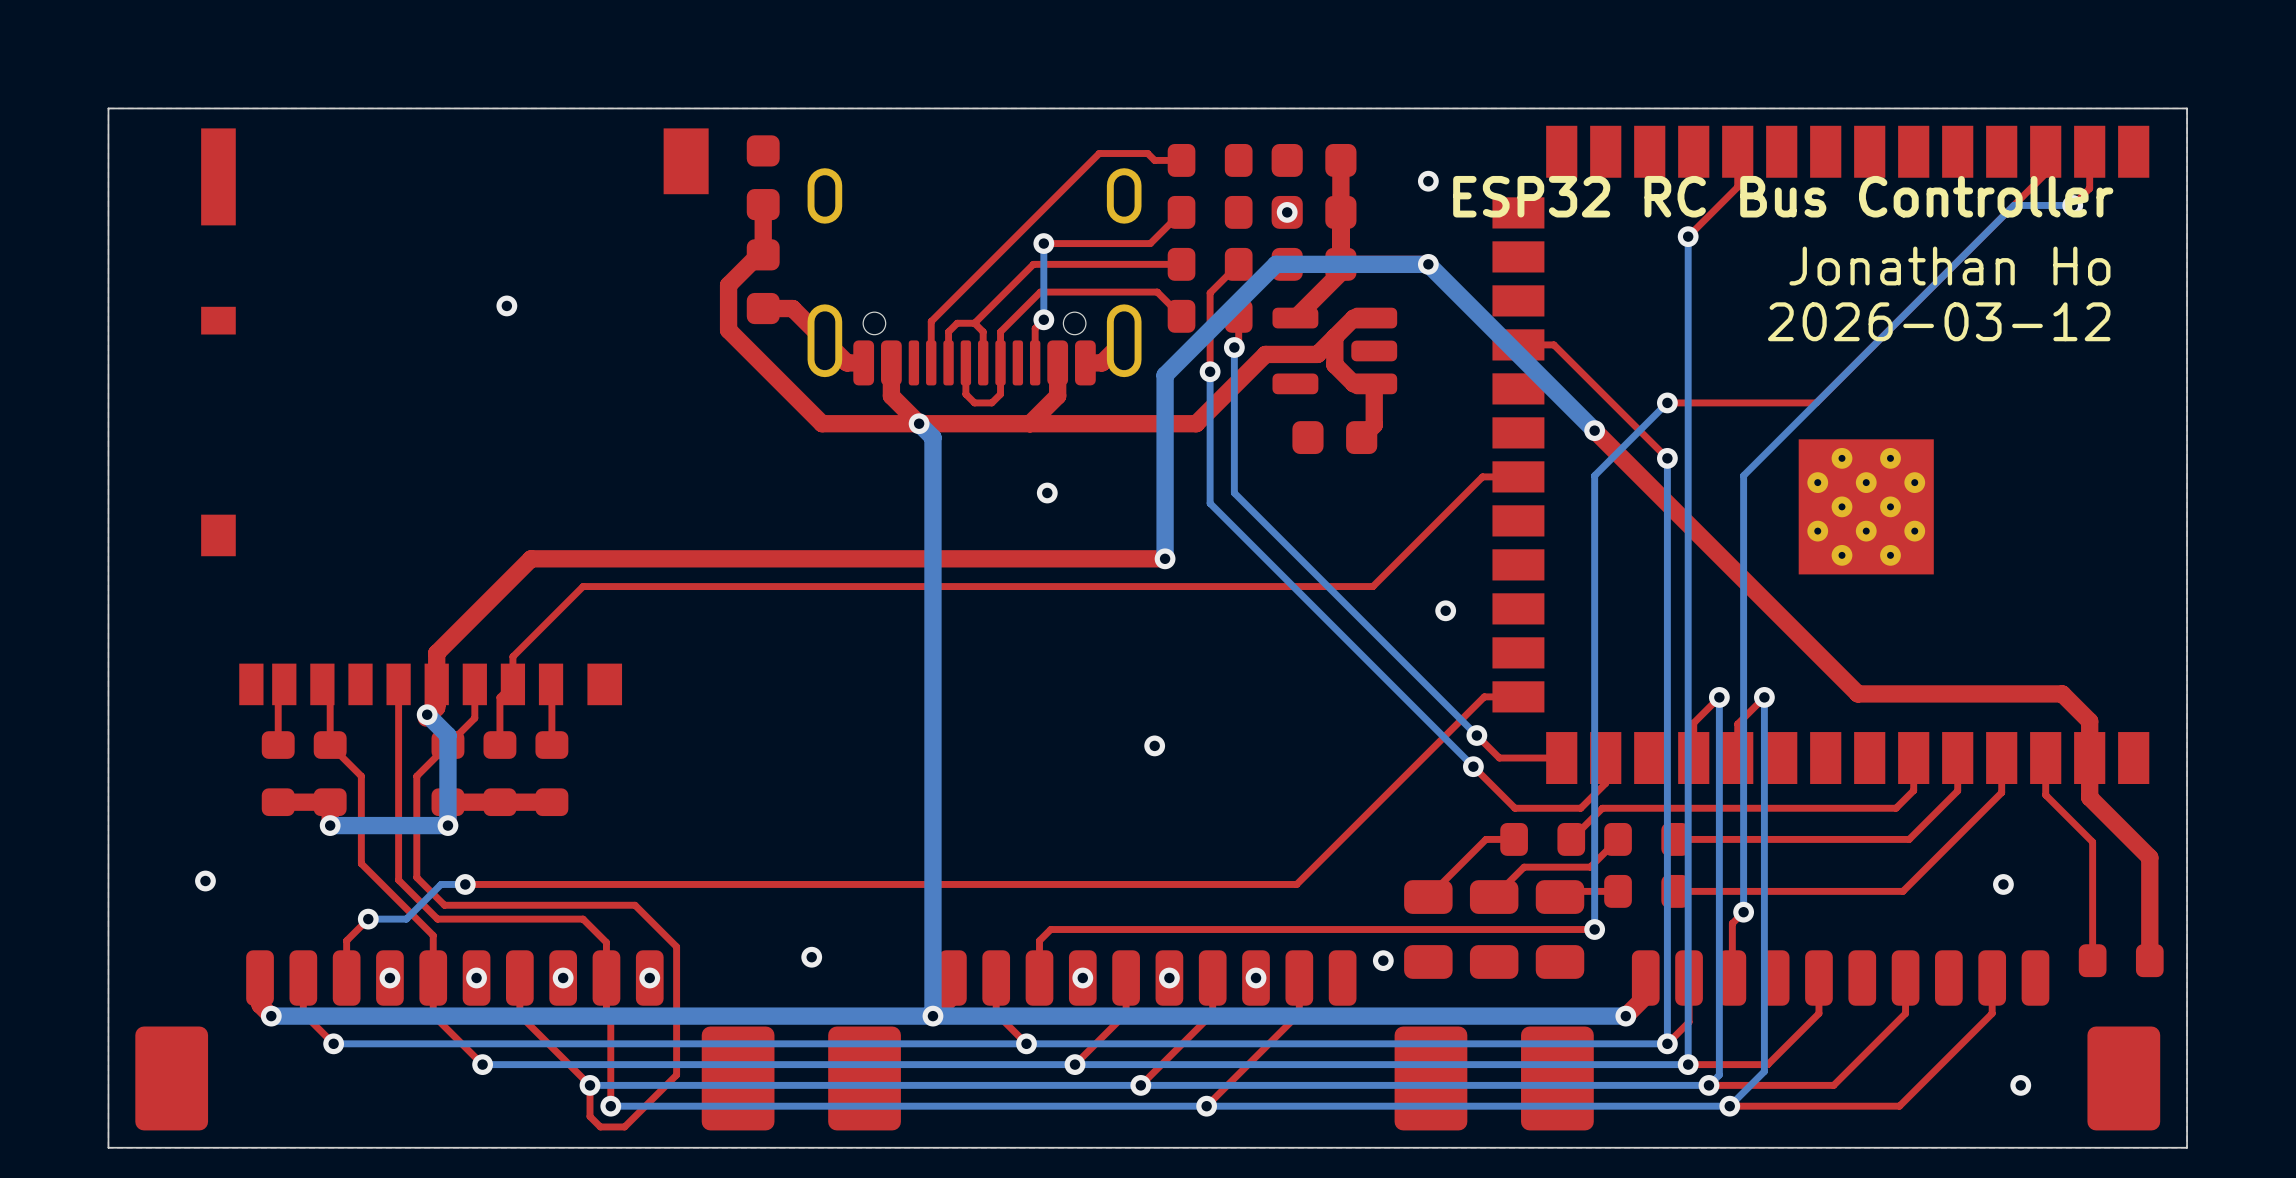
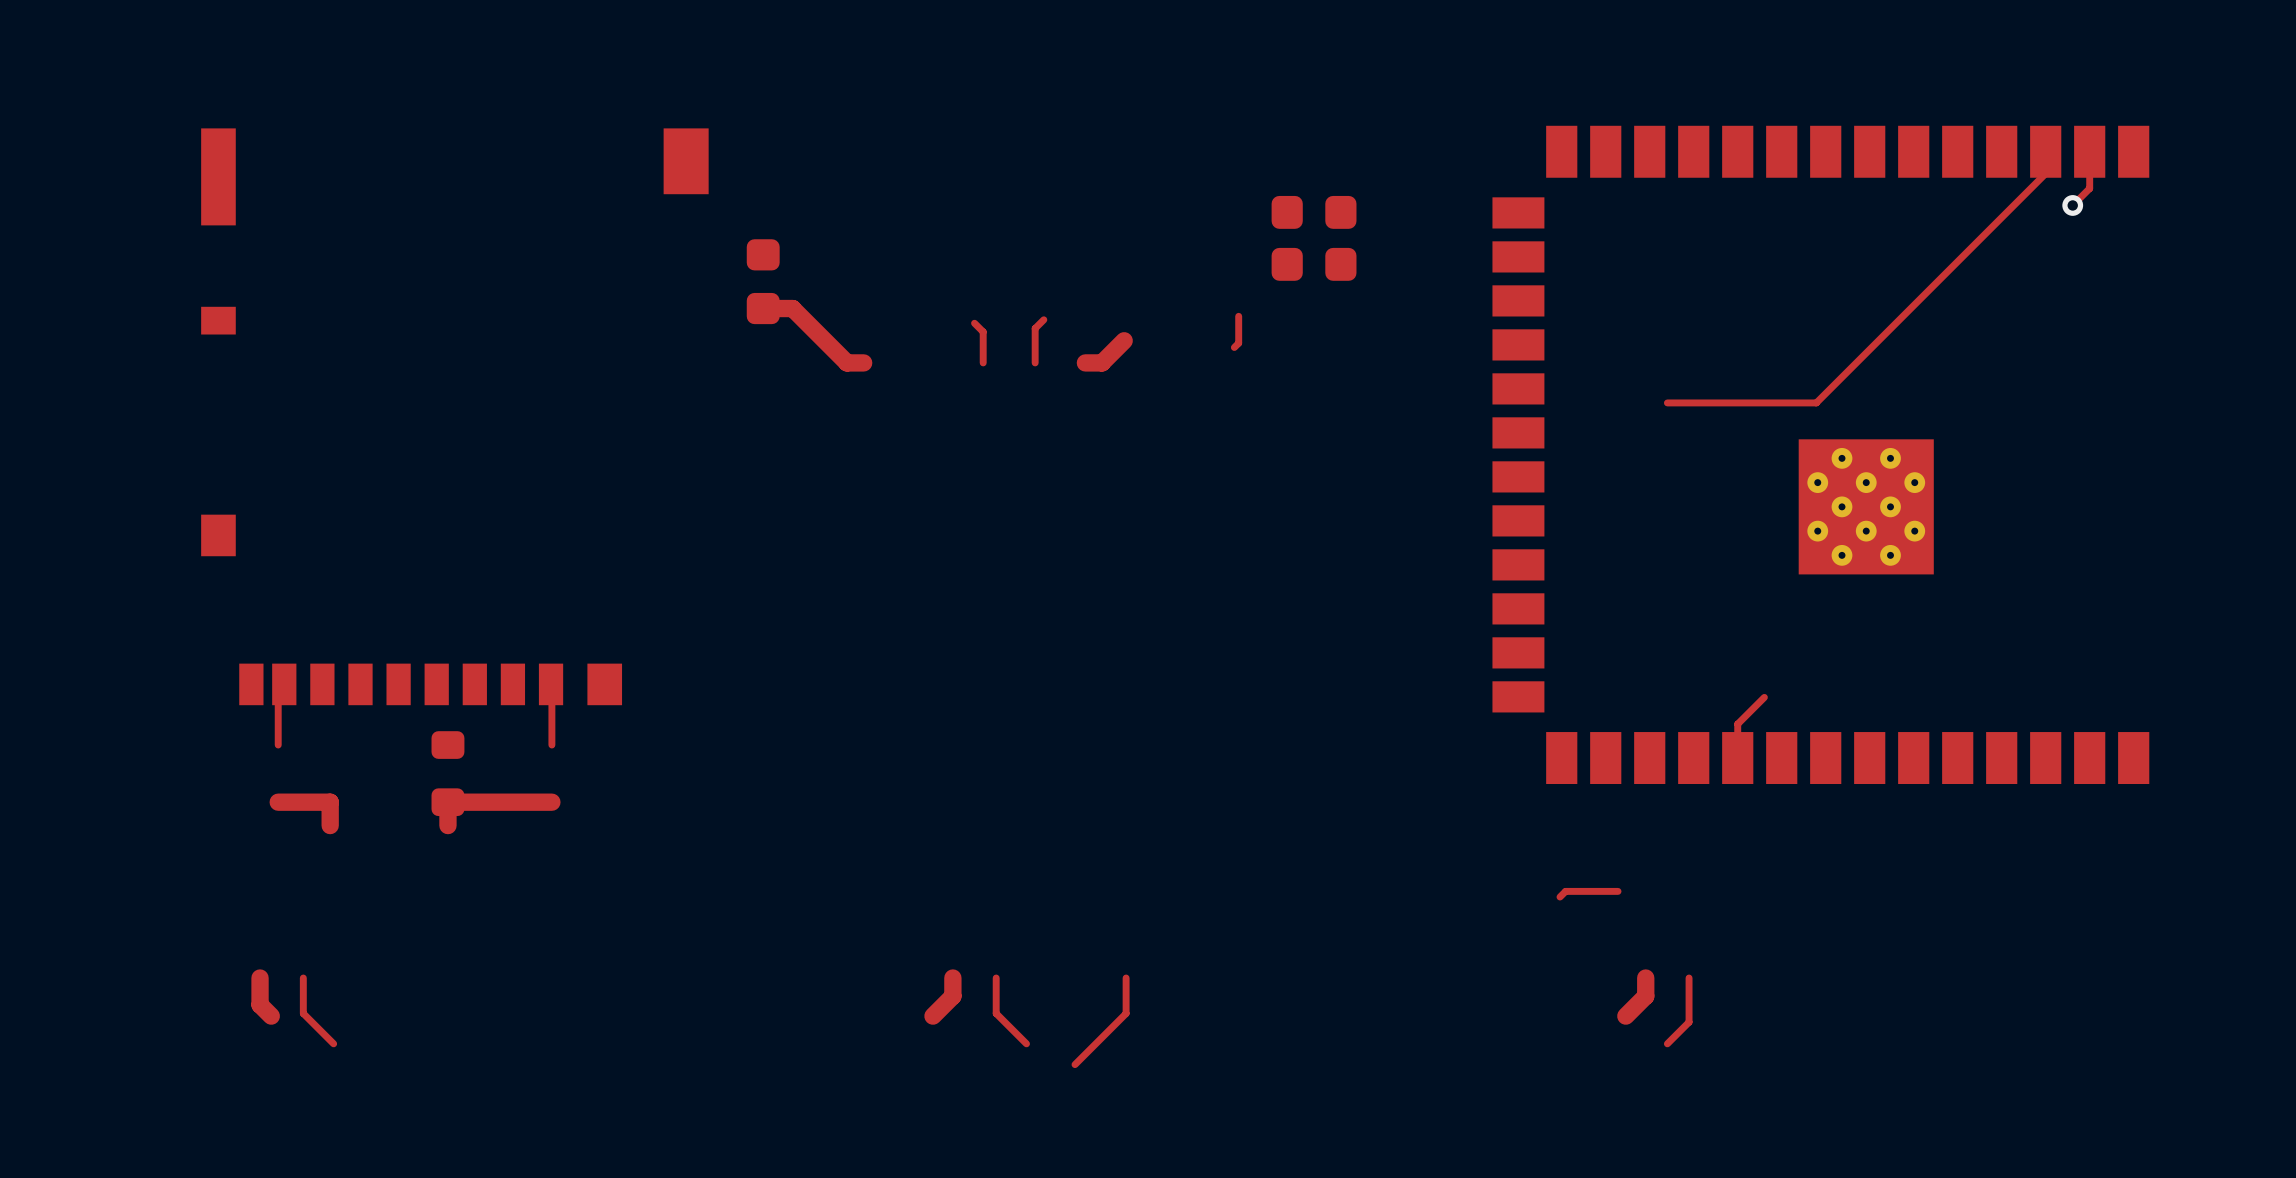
board edge: (2187, 108) (108, 108) (108, 1147) (2187, 1147) (2187, 108) -> none
top track: (1737, 151) (1737, 187) (1688, 236) -> none
top track: (1181, 160) (1154, 160) (1147, 153) (1099, 153) (931, 321) (931, 362) -> none
part: (1210, 160) -> none
part: (1314, 160) -> none
top track: (1340, 160) (1340, 272) (1295, 318) -> none
part: (763, 177) -> none
via: (1428, 181) -> none
text: ESP32 RC Bus Controller (1783, 196) -> none
top track: (763, 204) (763, 254) (758, 254) (728, 285) (728, 330) (822, 423) (1196, 423) (1265, 354) (1317, 354) (1353, 318) (1374, 318) -> none
bottom track: (2072, 205) (2013, 205) (1743, 475) (1743, 912) -> none
top track: (1181, 212) (1150, 243) (1043, 243) -> none
part: (1210, 212) -> none
via: (1287, 212) -> none
bottom track: (1688, 236) (1688, 1064) (482, 1064) -> none
via: (1688, 236) -> none
bottom track: (1043, 243) (1043, 319) -> none
via: (1043, 243) -> none
top track: (1181, 264) (1033, 264) (974, 323) (957, 323) (948, 331) (948, 362) -> none
part: (1210, 264) -> none
top track: (1238, 264) (1210, 292) (1210, 371) -> none
via: (1428, 264) -> none
text: Jonathan Ho (1949, 266) -> none
part: (974, 276) -> none
via: (506, 305) -> none
top track: (1181, 316) (1157, 292) (1040, 292) (1000, 331) (1000, 394) (991, 402) (974, 402) (965, 394) (965, 362) -> none
part: (1210, 316) -> none
via: (1043, 319) -> none
text: 2026-03-12 (1939, 321) -> none
top track: (1334, 337) (1334, 364) (1353, 383) (1374, 383) (1374, 425) (1361, 437) -> none
top track: (1518, 344) (1553, 344) (1667, 458) -> none
bottom track: (1234, 347) (1234, 493) (1476, 735) -> none
via: (1234, 347) -> none
part: (1334, 350) -> none
top track: (891, 362) (891, 396) (919, 423) -> none
top track: (1057, 362) (1057, 396) (1029, 423) -> none
bottom track: (1210, 371) (1210, 503) (1473, 766) -> none
via: (1210, 371) -> none
bottom track: (1667, 402) (1594, 475) (1594, 929) -> none
via: (1667, 402) -> none
bottom track: (919, 423) (932, 437) (932, 1016) -> none
via: (919, 423) -> none
top track: (1594, 430) (1857, 693) (2062, 693) (2089, 721) (2089, 797) (2149, 857) (2149, 960) -> none
bottom track: (1594, 430) (1428, 264) (1275, 264) (1165, 375) (1165, 558) -> none
via: (1594, 430) -> none
part: (1334, 437) -> none
bottom track: (1667, 458) (1667, 1043) (333, 1043) -> none
via: (1667, 458) -> none
top track: (1518, 476) (1482, 476) (1372, 586) (583, 586) (512, 656) (512, 684) (499, 697) (499, 745) -> none
via: (1047, 493) -> none
top track: (1165, 558) (531, 558) (436, 653) (436, 707) (426, 718) -> none
via: (1165, 558) -> none
via: (1445, 610) -> none
top track: (322, 684) (330, 692) (330, 745) (361, 776) (361, 863) (433, 935) (433, 1015) (482, 1064) -> none
top track: (398, 684) (398, 880) (437, 919) (583, 919) (606, 942) (606, 1015) (610, 1019) (610, 1106) -> none
top track: (474, 684) (474, 718) (416, 776) (416, 877) (444, 905) (635, 905) (676, 946) (676, 1075) (624, 1126) (600, 1126) (590, 1116) (590, 1085) (519, 1015) (519, 978) -> none
top track: (1518, 696) (1484, 696) (1296, 884) (465, 884) -> none
top track: (1719, 697) (1693, 723) (1693, 758) -> none
bottom track: (1719, 697) (1719, 1075) (1708, 1085) (590, 1085) -> none
via: (1719, 697) -> none
bottom track: (1764, 697) (1764, 1071) (1729, 1106) (610, 1106) -> none
via: (1764, 697) -> none
bottom track: (427, 714) (447, 735) (447, 825) (330, 825) -> none
via: (427, 714) -> none
top track: (1476, 735) (1499, 758) (1561, 758) -> none
via: (1476, 735) -> none
via: (1154, 745) -> none
top track: (1605, 758) (1605, 783) (1580, 808) (1514, 808) (1473, 766) -> none
top track: (1913, 758) (1913, 790) (1896, 808) (1602, 808) (1571, 839) -> none
top track: (1957, 758) (1957, 790) (1909, 839) (1675, 839) -> none
top track: (2001, 758) (2001, 792) (1902, 891) (1675, 891) -> none
top track: (2045, 758) (2045, 795) (2092, 842) (2092, 960) -> none
via: (1473, 766) -> none
part: (278, 773) -> none
part: (330, 773) -> none
part: (499, 773) -> none
part: (551, 773) -> none
via: (330, 825) -> none
via: (447, 825) -> none
top track: (1514, 839) (1485, 839) (1428, 897) -> none
part: (1542, 839) -> none
top track: (1618, 839) (1590, 867) (1524, 867) (1494, 897) -> none
part: (1646, 839) -> none
via: (205, 881) -> none
bottom track: (465, 884) (441, 884) (406, 919) (368, 919) -> none
via: (465, 884) -> none
via: (2003, 884) -> none
part: (1646, 891) -> none
top track: (1743, 912) (1732, 923) (1732, 978) -> none
via: (1743, 912) -> none
top track: (368, 919) (346, 940) (346, 978) -> none
via: (368, 919) -> none
part: (1428, 929) -> none
part: (1494, 929) -> none
part: (1560, 929) -> none
top track: (1594, 929) (1050, 929) (1039, 940) (1039, 978) -> none
via: (1594, 929) -> none
via: (811, 957) -> none
via: (1383, 960) -> none
part: (2121, 960) -> none
via: (389, 978) -> none
via: (476, 978) -> none
via: (563, 978) -> none
via: (649, 978) -> none
via: (1082, 978) -> none
via: (1169, 978) -> none
top track: (1212, 978) (1212, 1013) (1140, 1085) -> none
via: (1256, 978) -> none
top track: (1299, 978) (1299, 1013) (1206, 1106) -> none
top track: (1818, 978) (1818, 1013) (1767, 1064) (1688, 1064) -> none
top track: (1905, 978) (1905, 1013) (1833, 1085) (1708, 1085) -> none
top track: (1992, 978) (1992, 1013) (1899, 1106) (1729, 1106) -> none
via: (271, 1016) -> none
via: (932, 1016) -> none
bottom track: (1625, 1016) (271, 1016) -> none
via: (1625, 1016) -> none
part: (454, 1040) -> none
part: (1147, 1040) -> none
part: (1840, 1040) -> none
via: (333, 1043) -> none
via: (1026, 1043) -> none
via: (1667, 1043) -> none
via: (482, 1064) -> none
via: (1075, 1064) -> none
via: (1688, 1064) -> none
via: (590, 1085) -> none
via: (1140, 1085) -> none
via: (1708, 1085) -> none
via: (2020, 1085) -> none
via: (610, 1106) -> none
via: (1206, 1106) -> none
via: (1729, 1106) -> none

